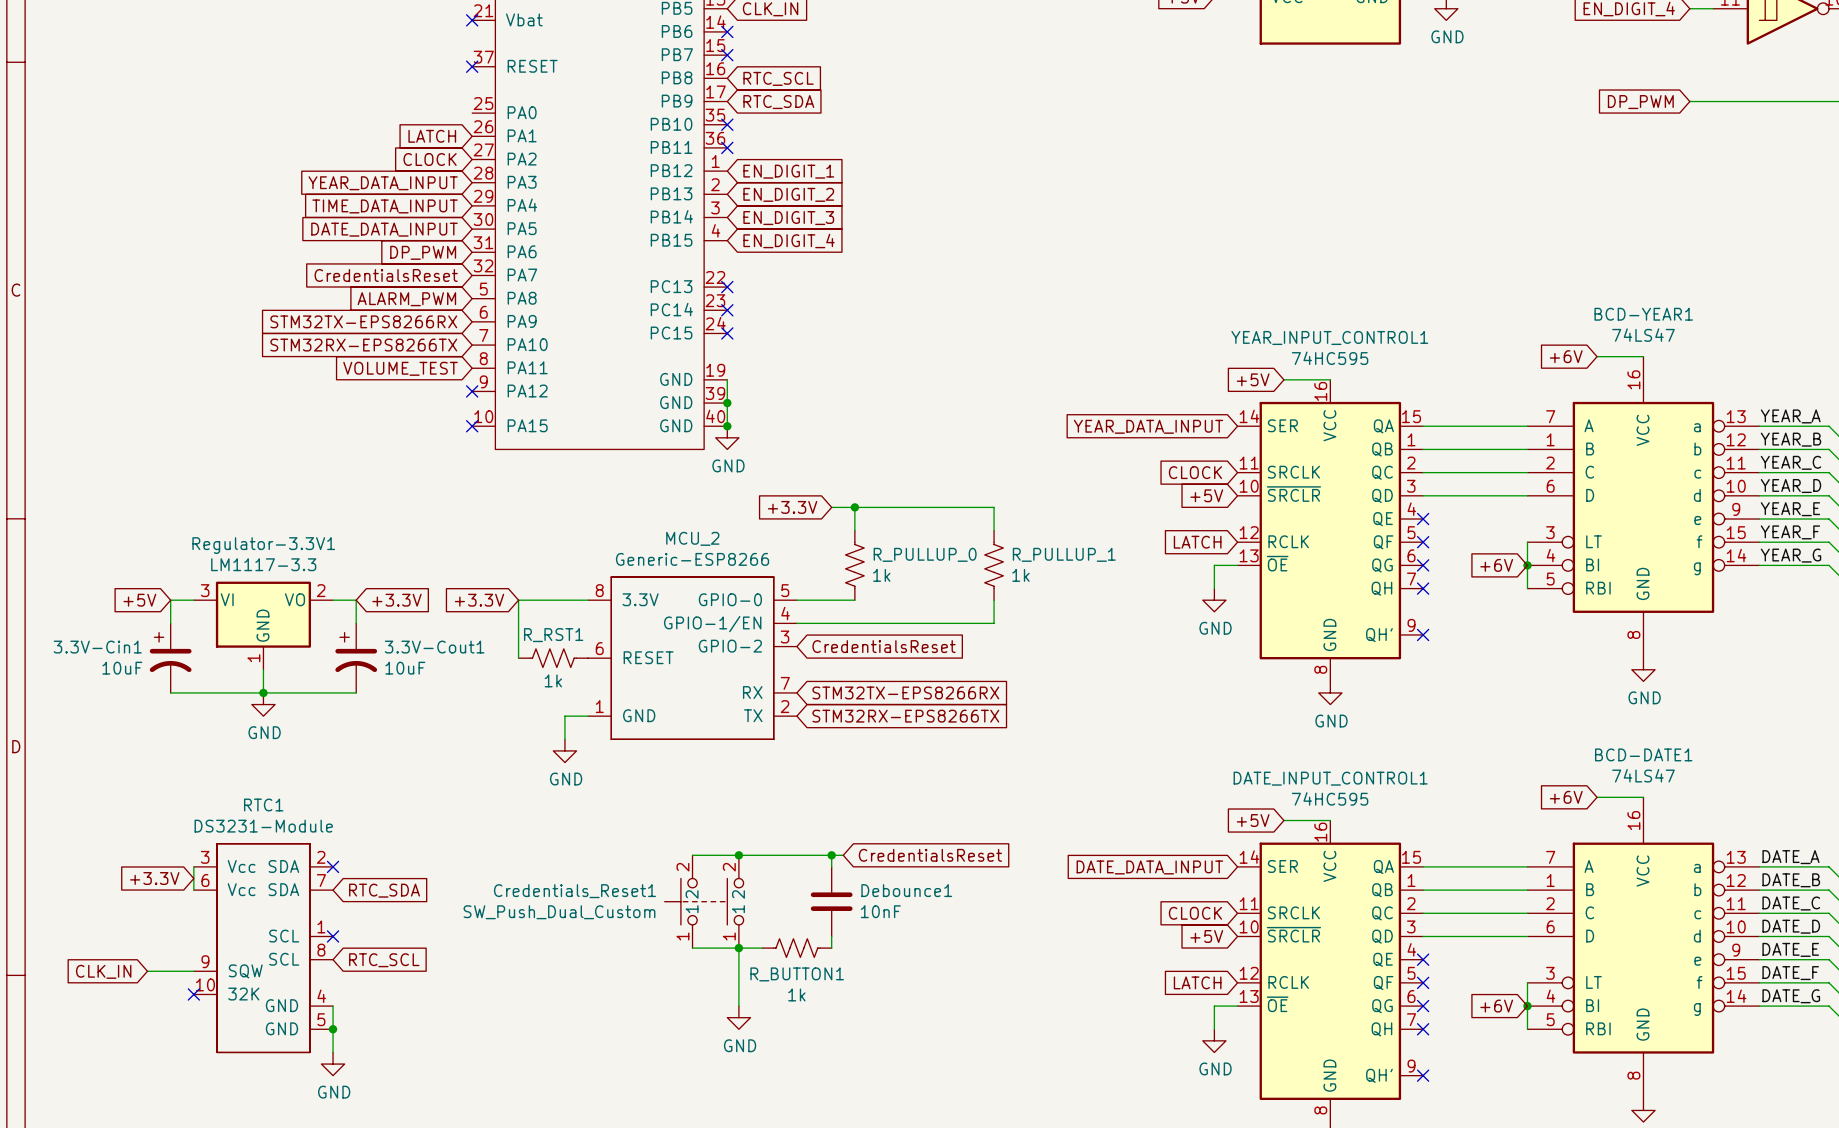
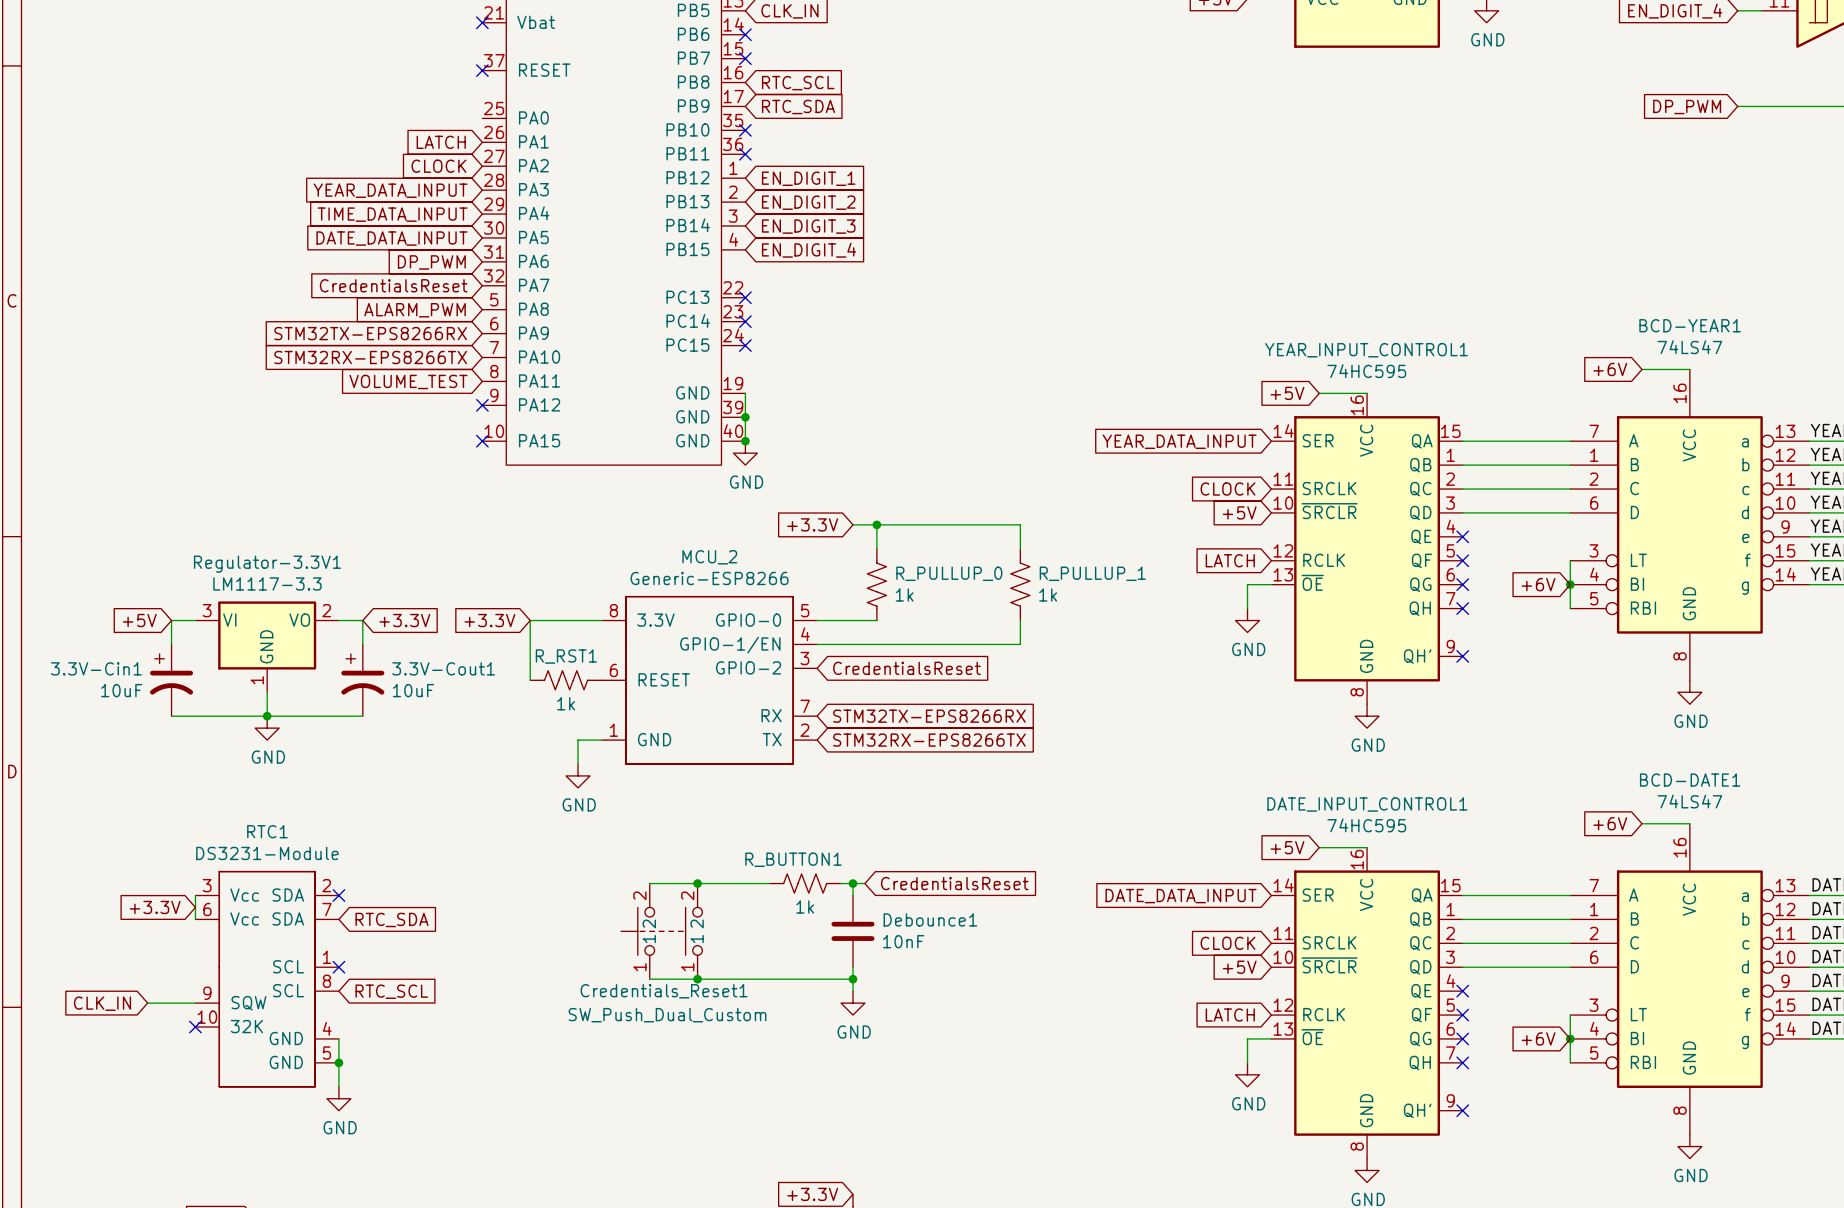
wire: none -> (649, 883) (709, 883)
junction: none -> (697, 883)
junction: (738, 855) -> none
Credentials_Reset1 name position: Credentials_Reset1 (574, 891) -> Credentials_Reset1 (664, 991)
Credentials_Reset1 position: (704, 901) -> (661, 931)
Credentials_Reset1 value position: SW_Push_Dual_Custom (559, 912) -> SW_Push_Dual_Custom (667, 1015)
wire: none -> (649, 979) (709, 979)
junction: none -> (697, 979)
wire: (738, 948) (738, 1006) -> none
junction: (738, 948) -> none
wire: none -> (781, 979) (852, 979) (852, 991)
R_BUTTON1 position: (796, 948) -> (805, 883)
junction: none -> (852, 979)
R_BUTTON1 name position: R_BUTTON1 (797, 974) -> R_BUTTON1 (793, 859)
R_BUTTON1 value position: 1k (796, 994) -> 1k (805, 907)
power symbol position: GND (738, 1017) -> GND (852, 1003)

